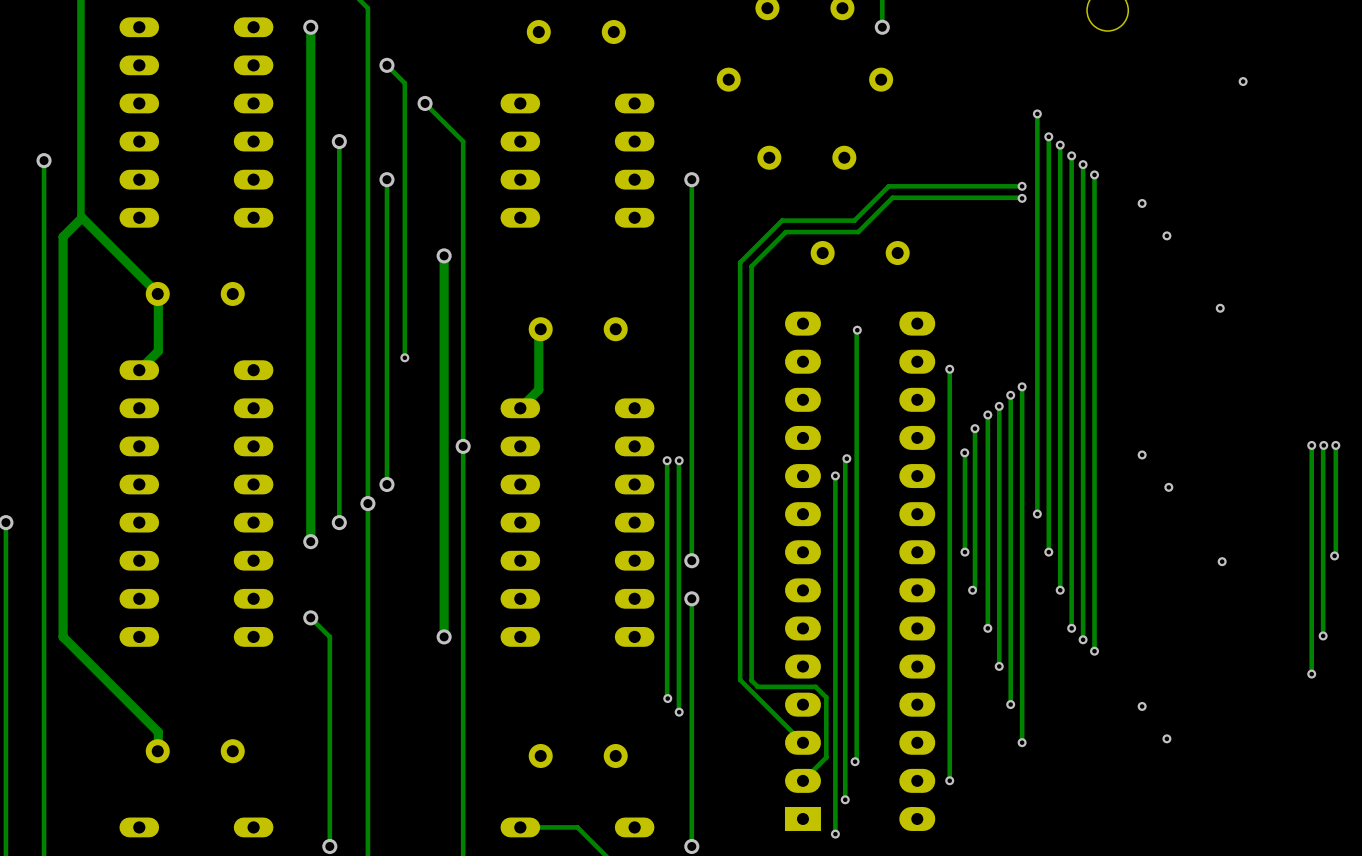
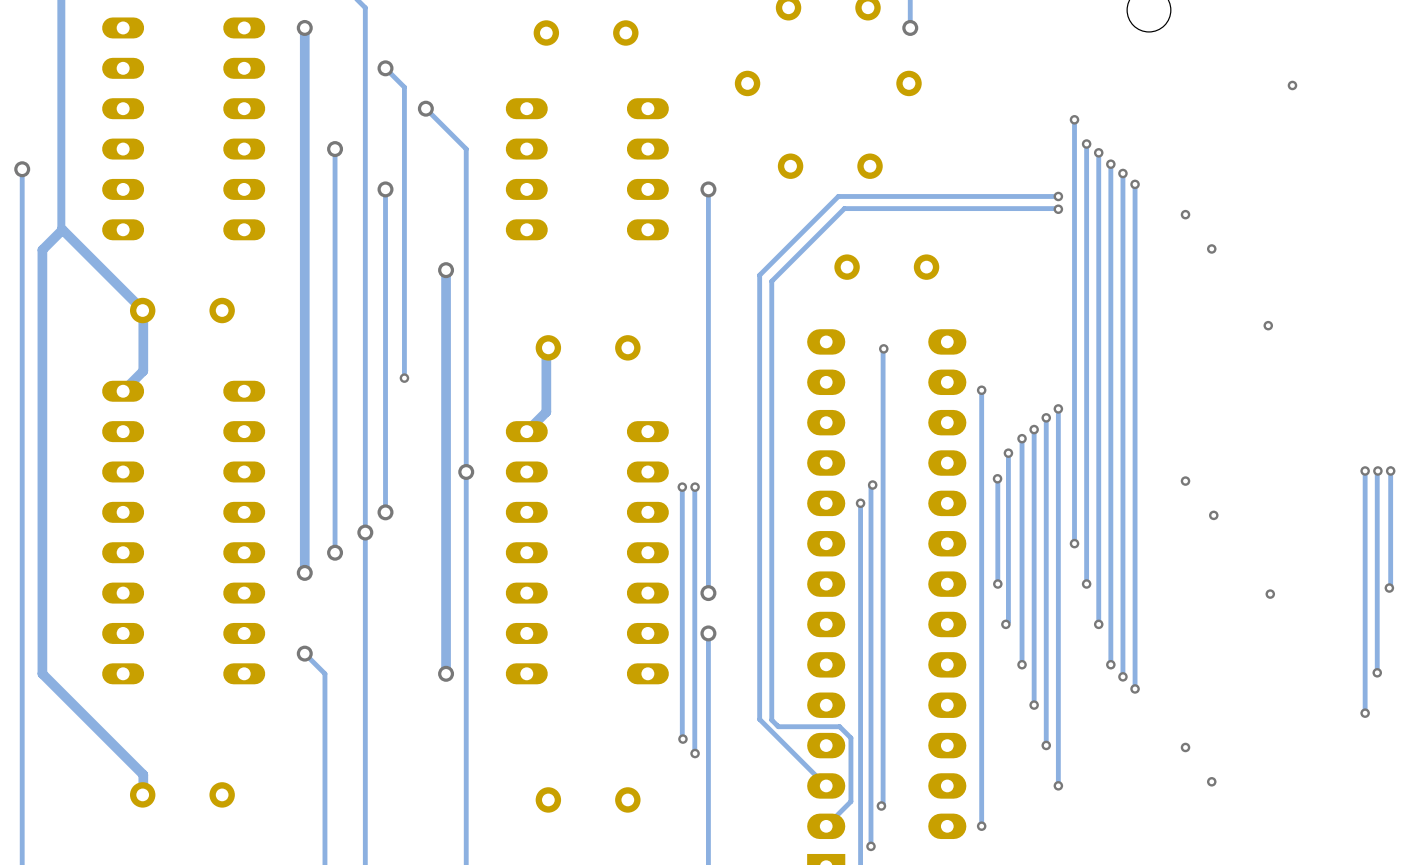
track: (888, 186) (854, 220) (782, 220) (740, 262) -> (917, 196) (838, 196) (759, 277)
track: (892, 197) (858, 232) (785, 232) -> (921, 208) (844, 208) (808, 244)

